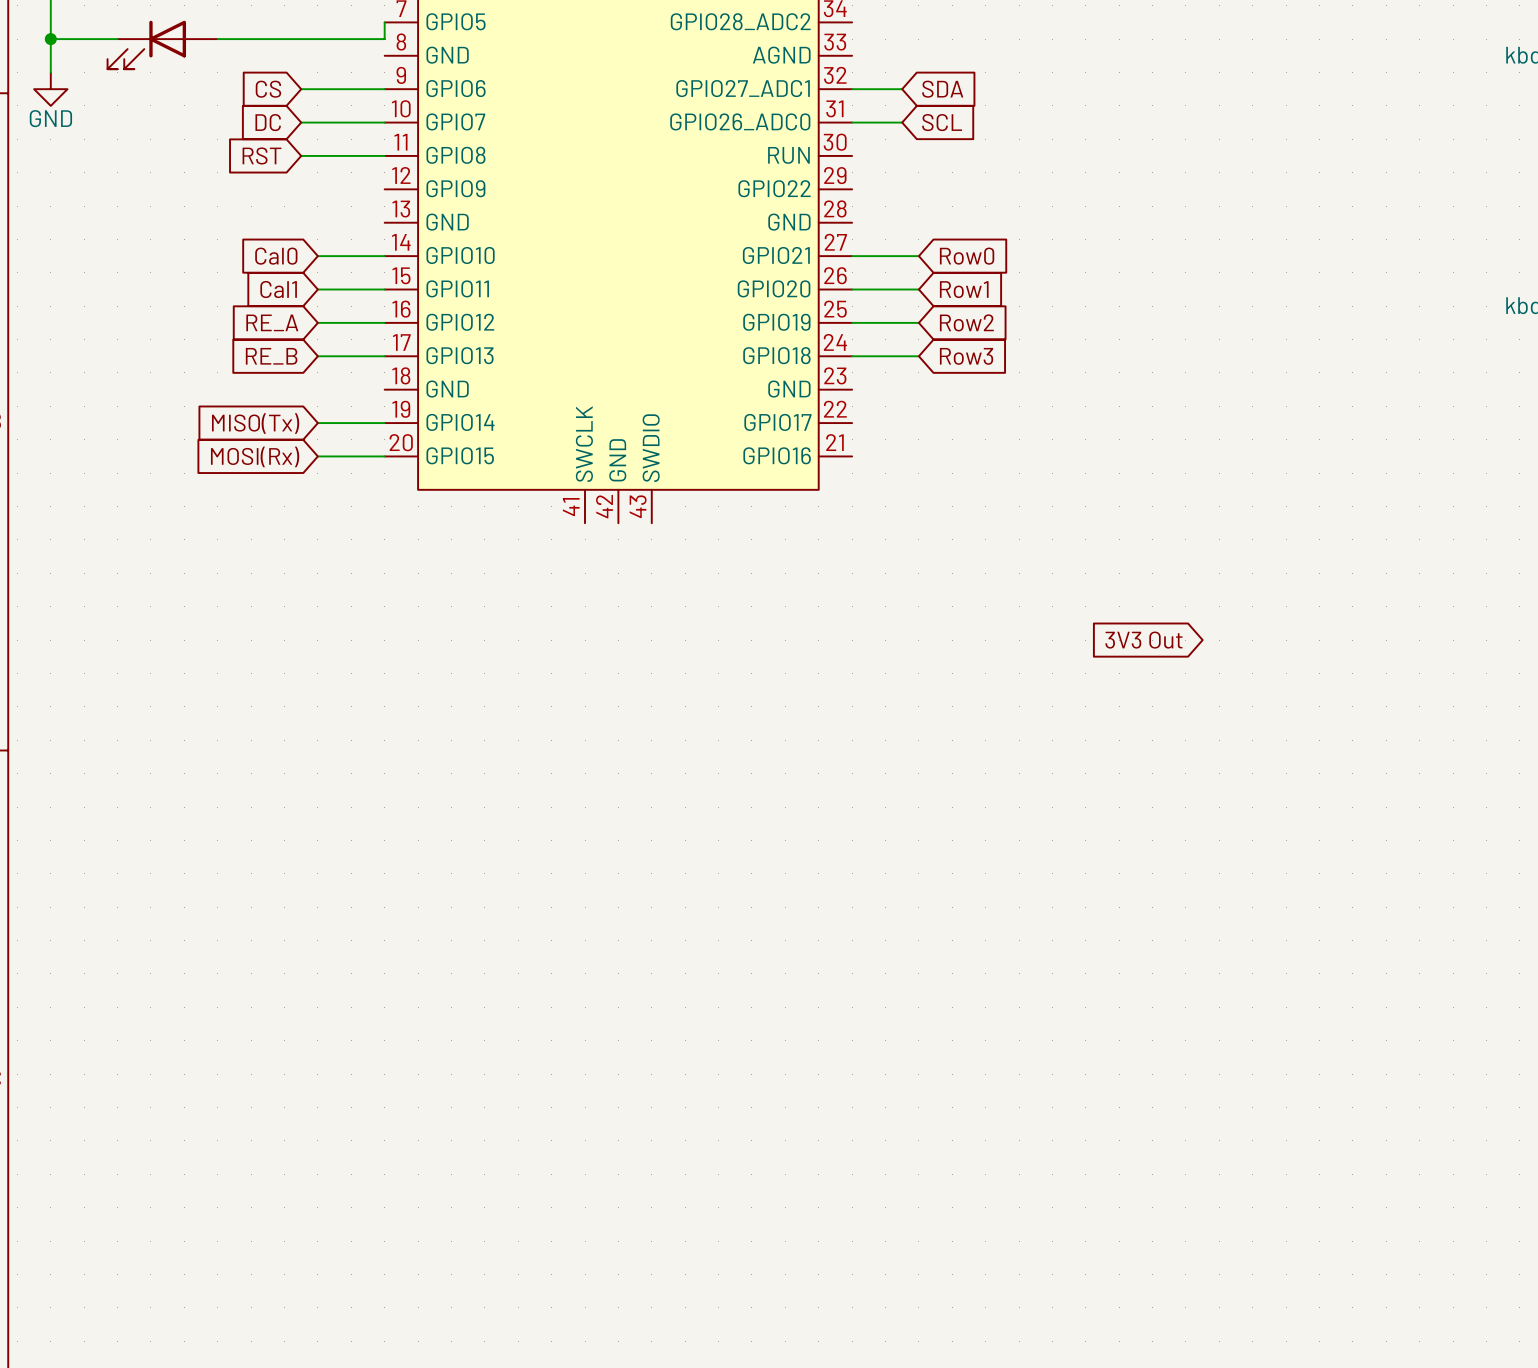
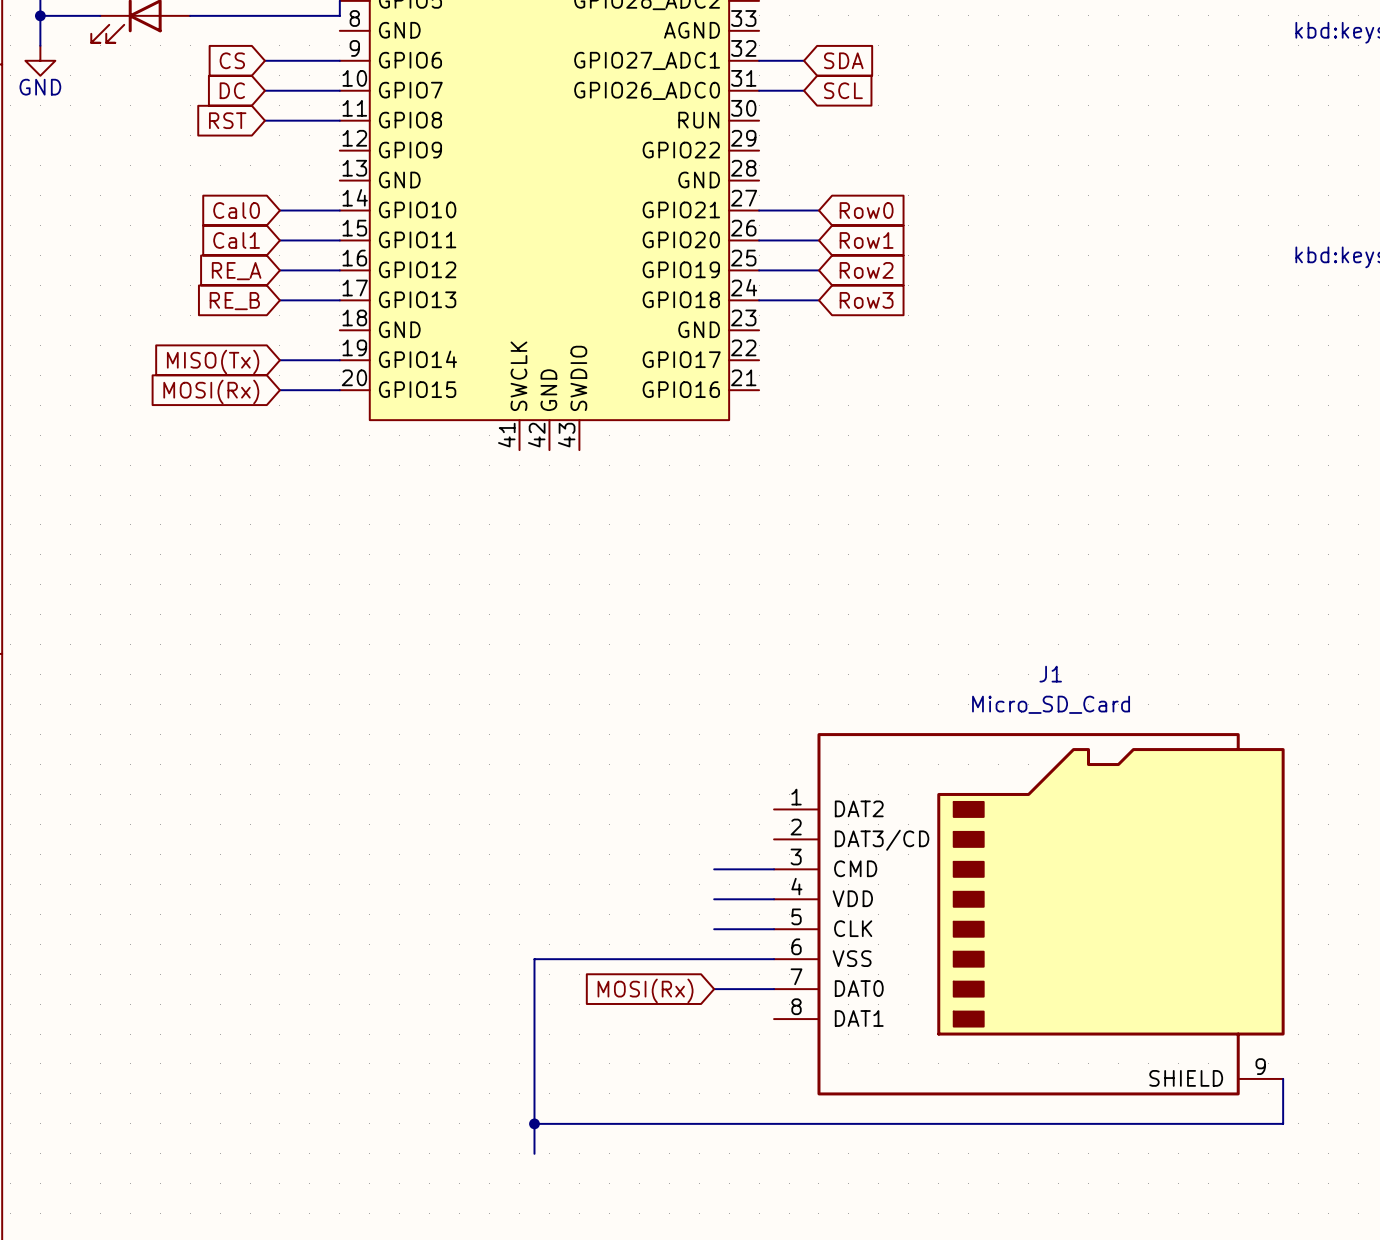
global label: 3V3 Out (1143, 640) -> none
wire: none -> (714, 869) (774, 869)
wire: none -> (714, 899) (774, 899)
J1: none -> Micro_SD_Card (1029, 914)
wire: none -> (714, 929) (774, 929)
wire: none -> (774, 959) (534, 959) (534, 1153)
global label: none -> MOSI(Rx) (645, 990)
wire: none -> (714, 989) (774, 989)
wire: none -> (1283, 1078) (1283, 1123) (534, 1123)
junction: none -> (534, 1123)

